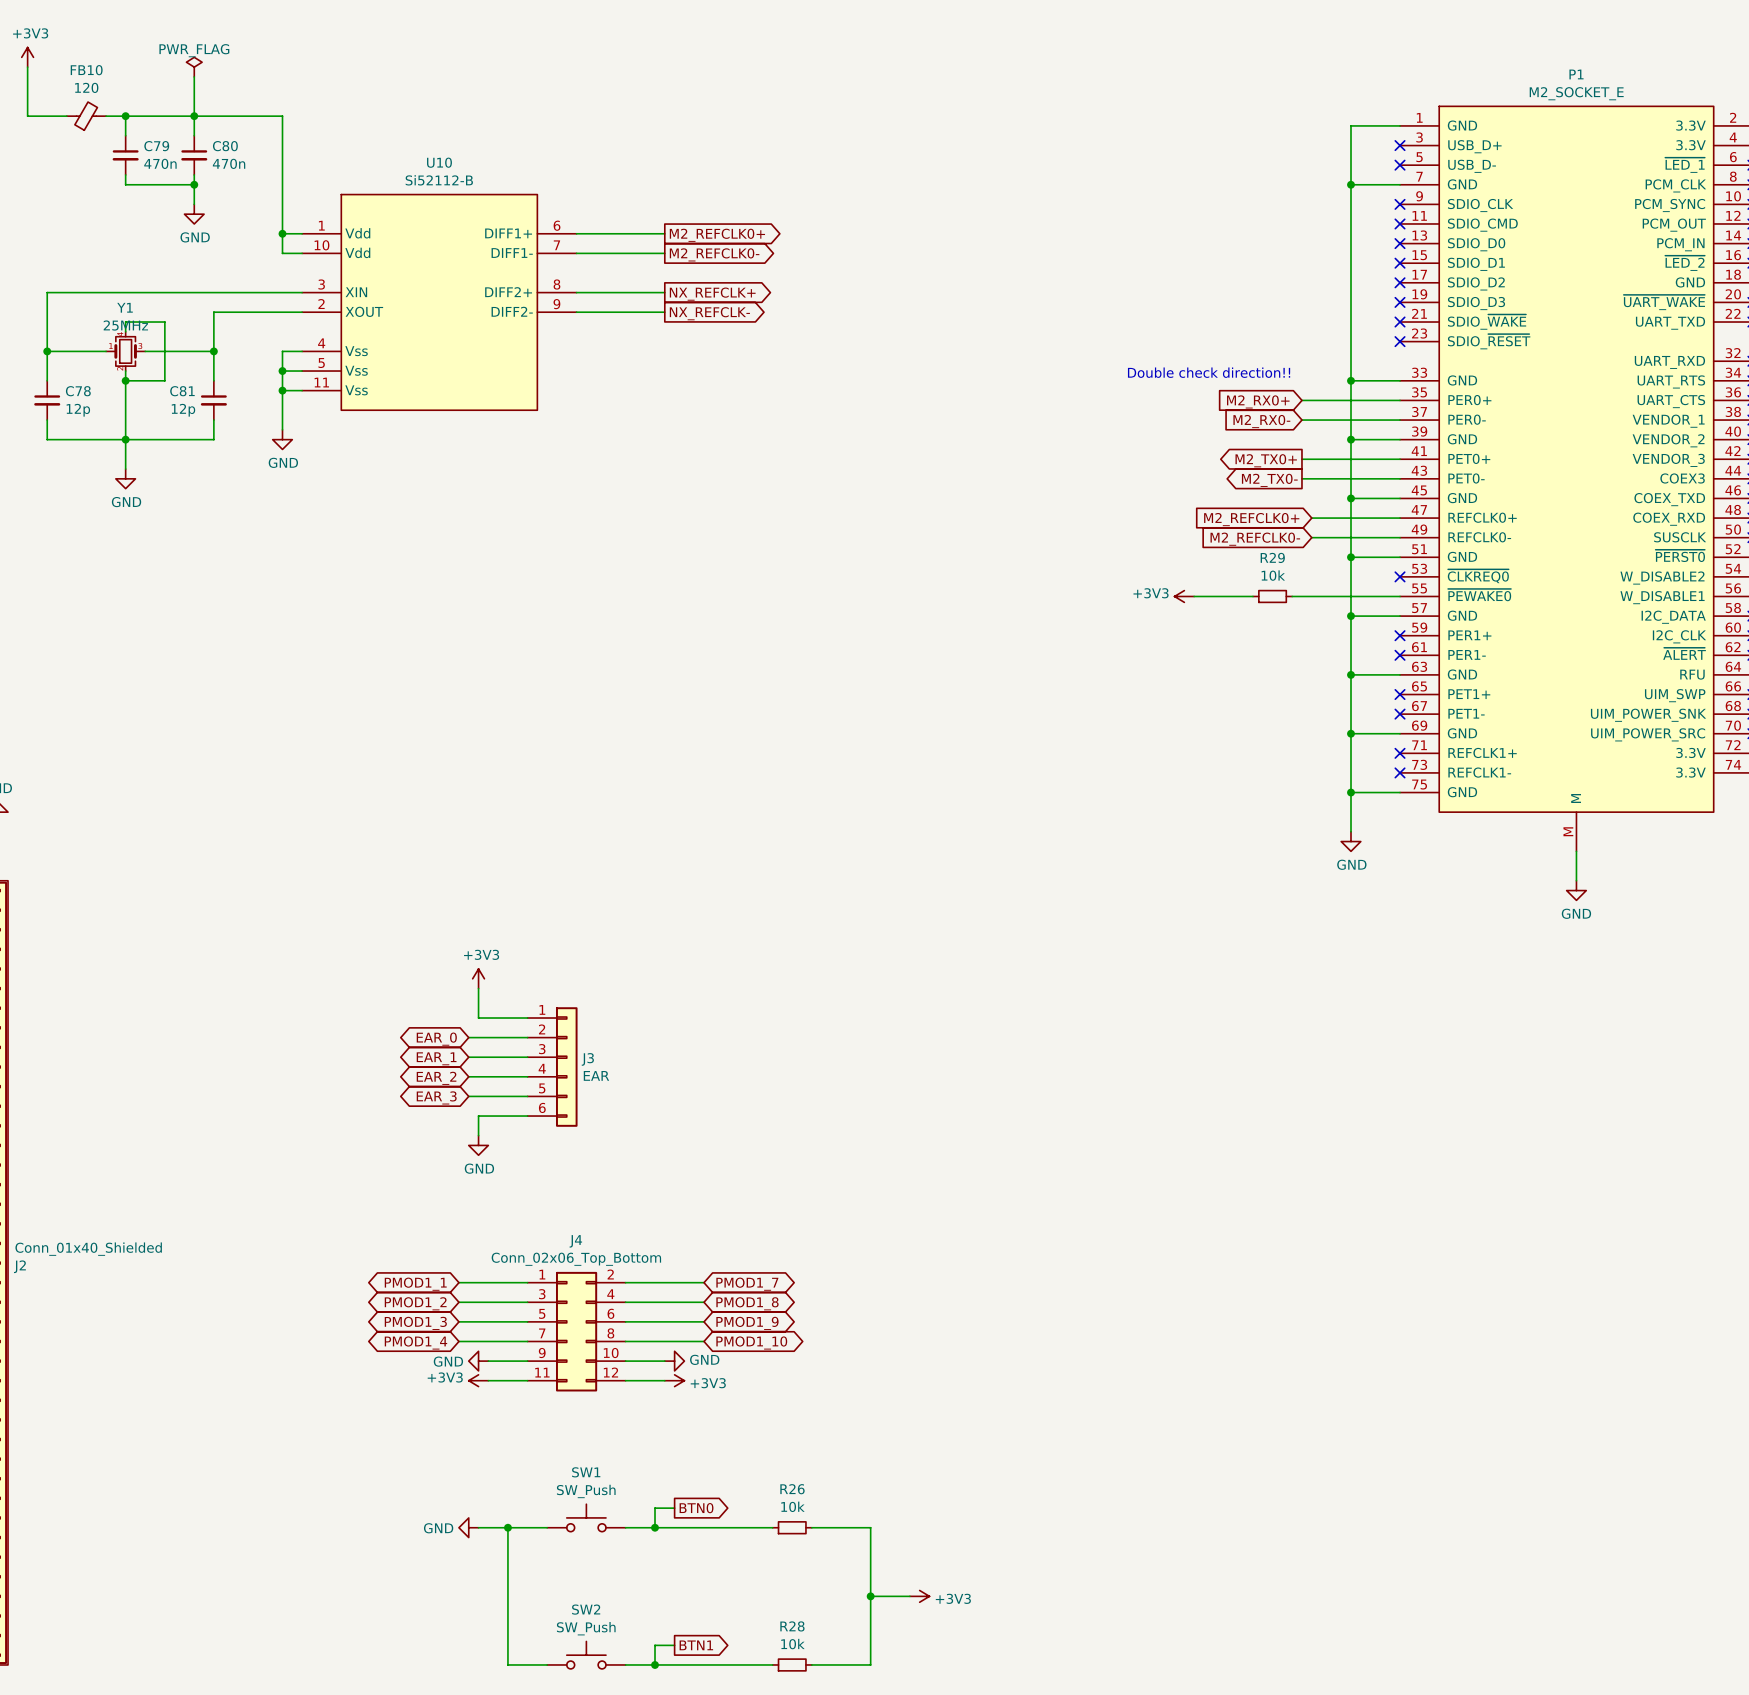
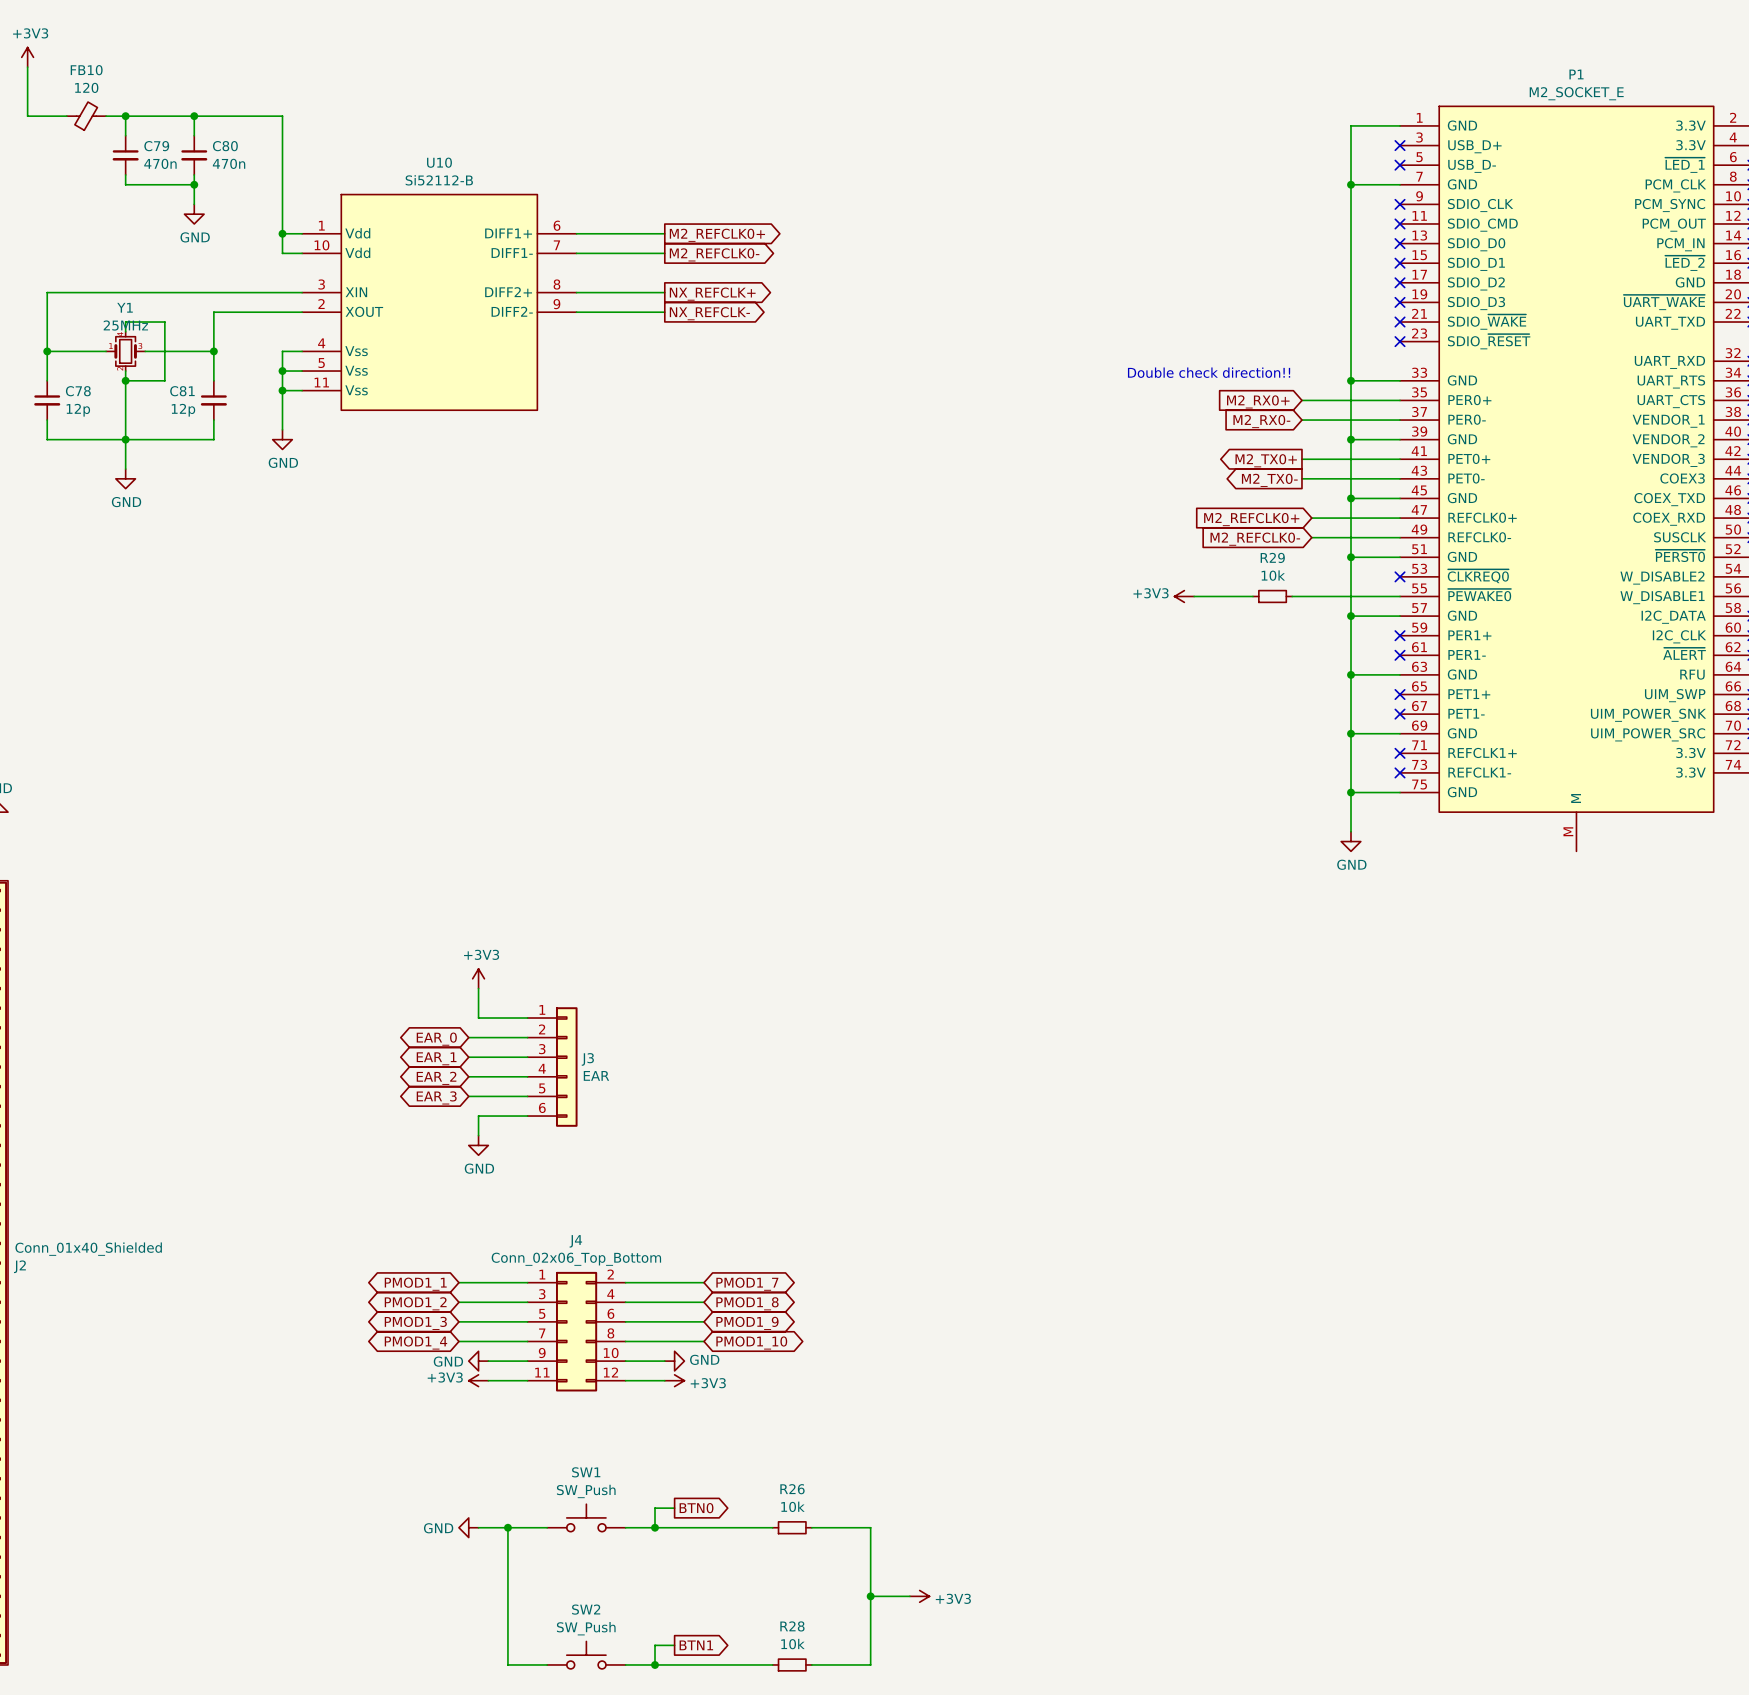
power symbol: PWR_FLAG (194, 67) -> none
wire: (194, 76) (194, 116) -> none
wire: (1576, 851) (1576, 880) -> none
power symbol: GND (1576, 890) -> none

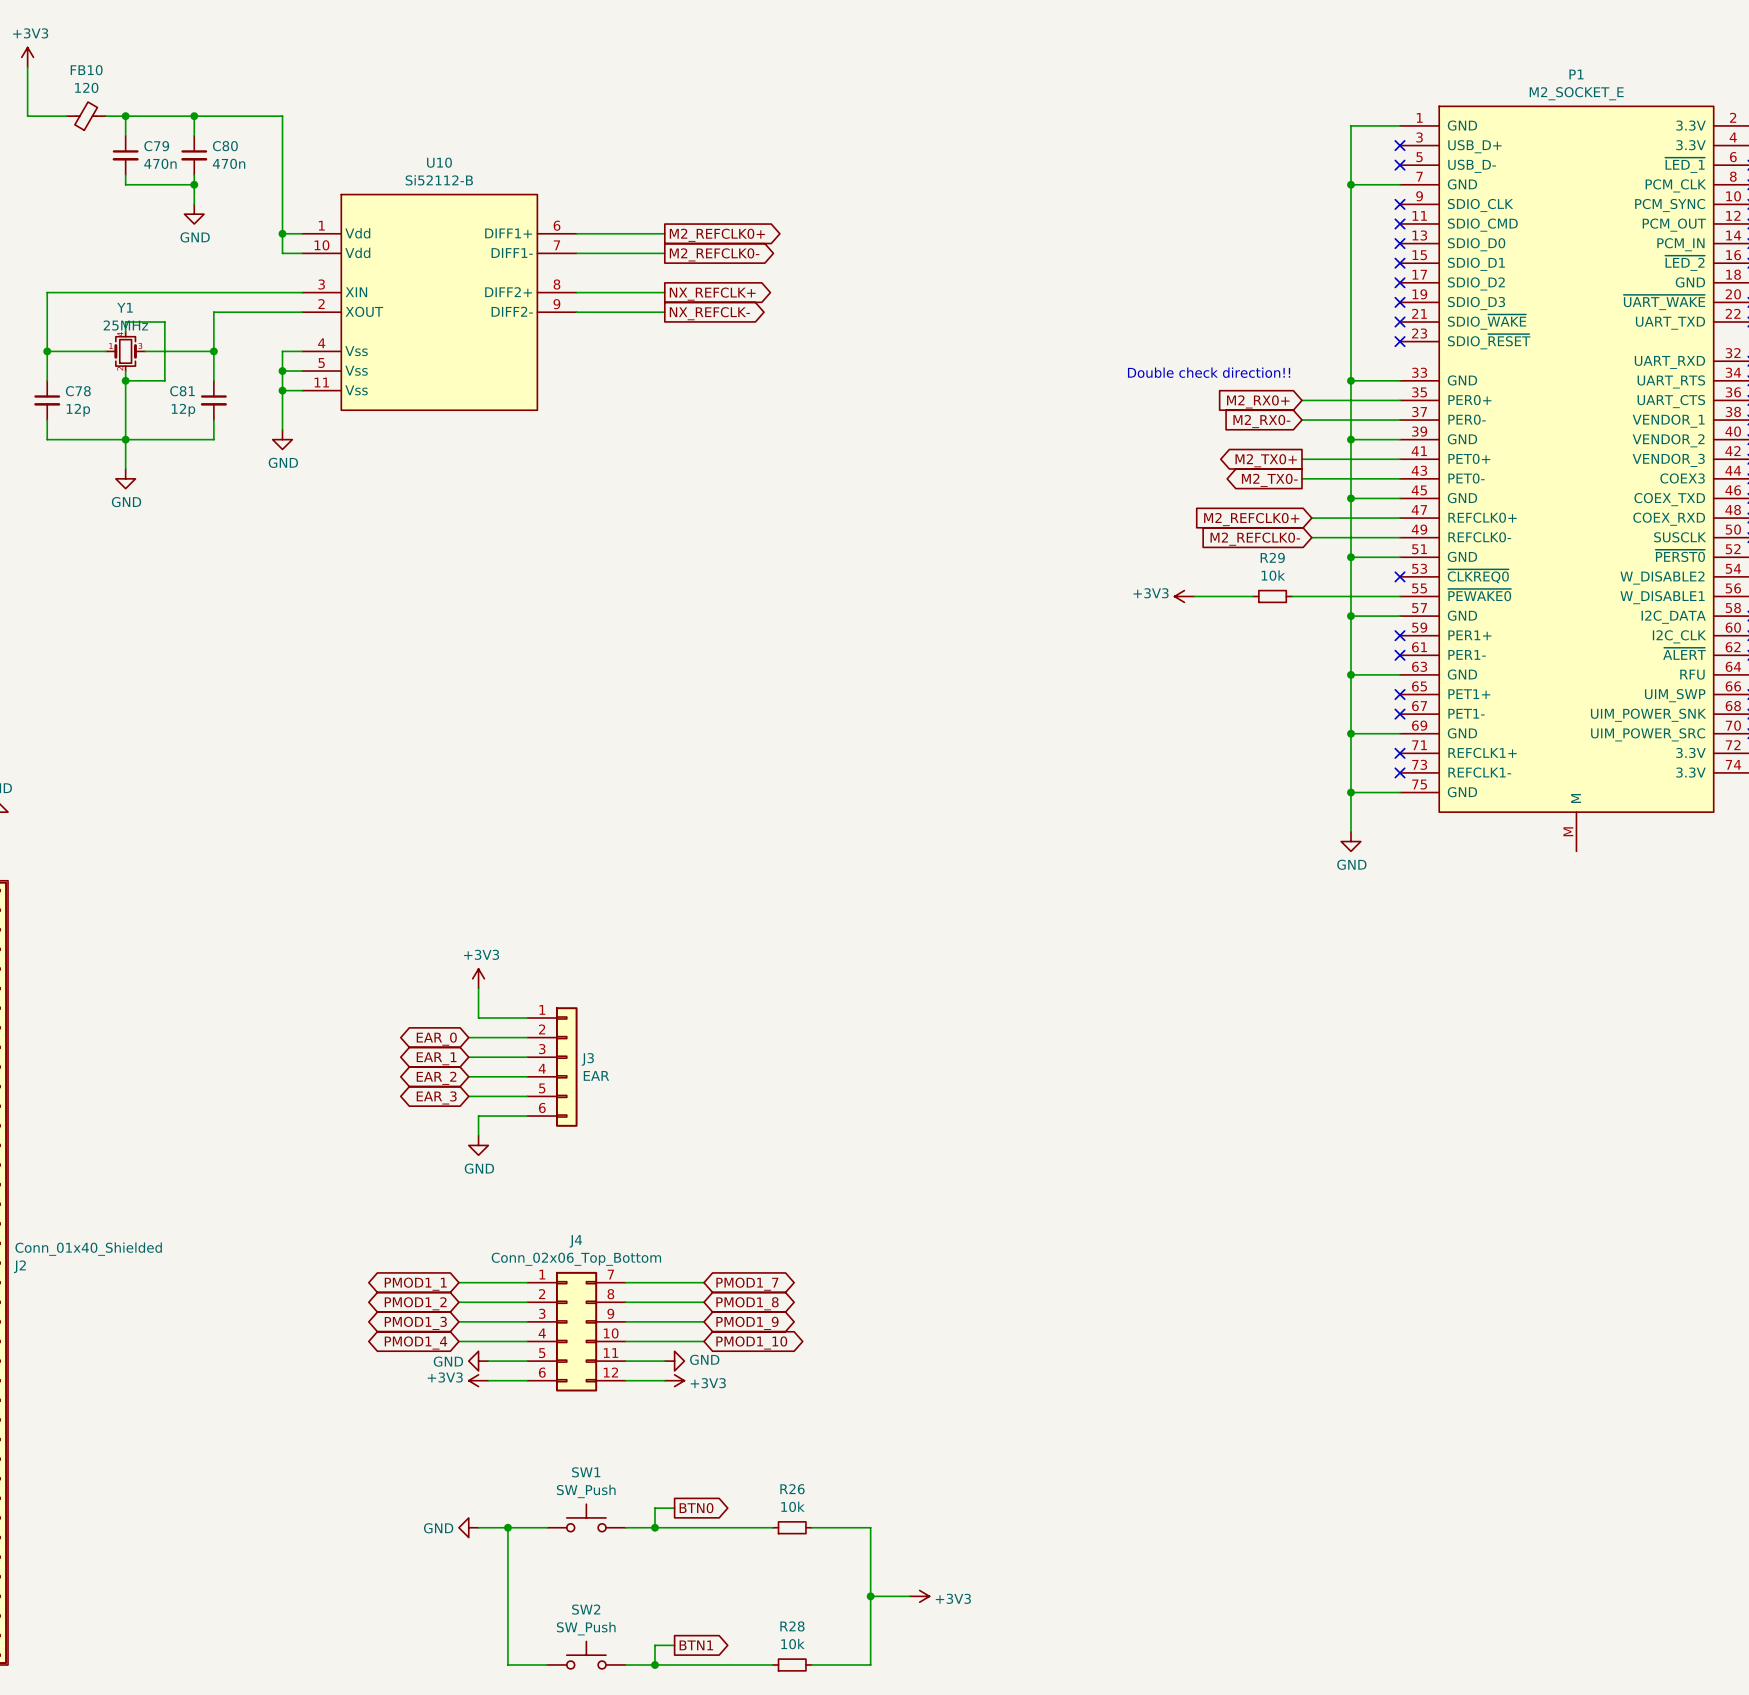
J4 symbol: [527, 1271, 626, 1392] -> [527, 1271, 626, 1392]

